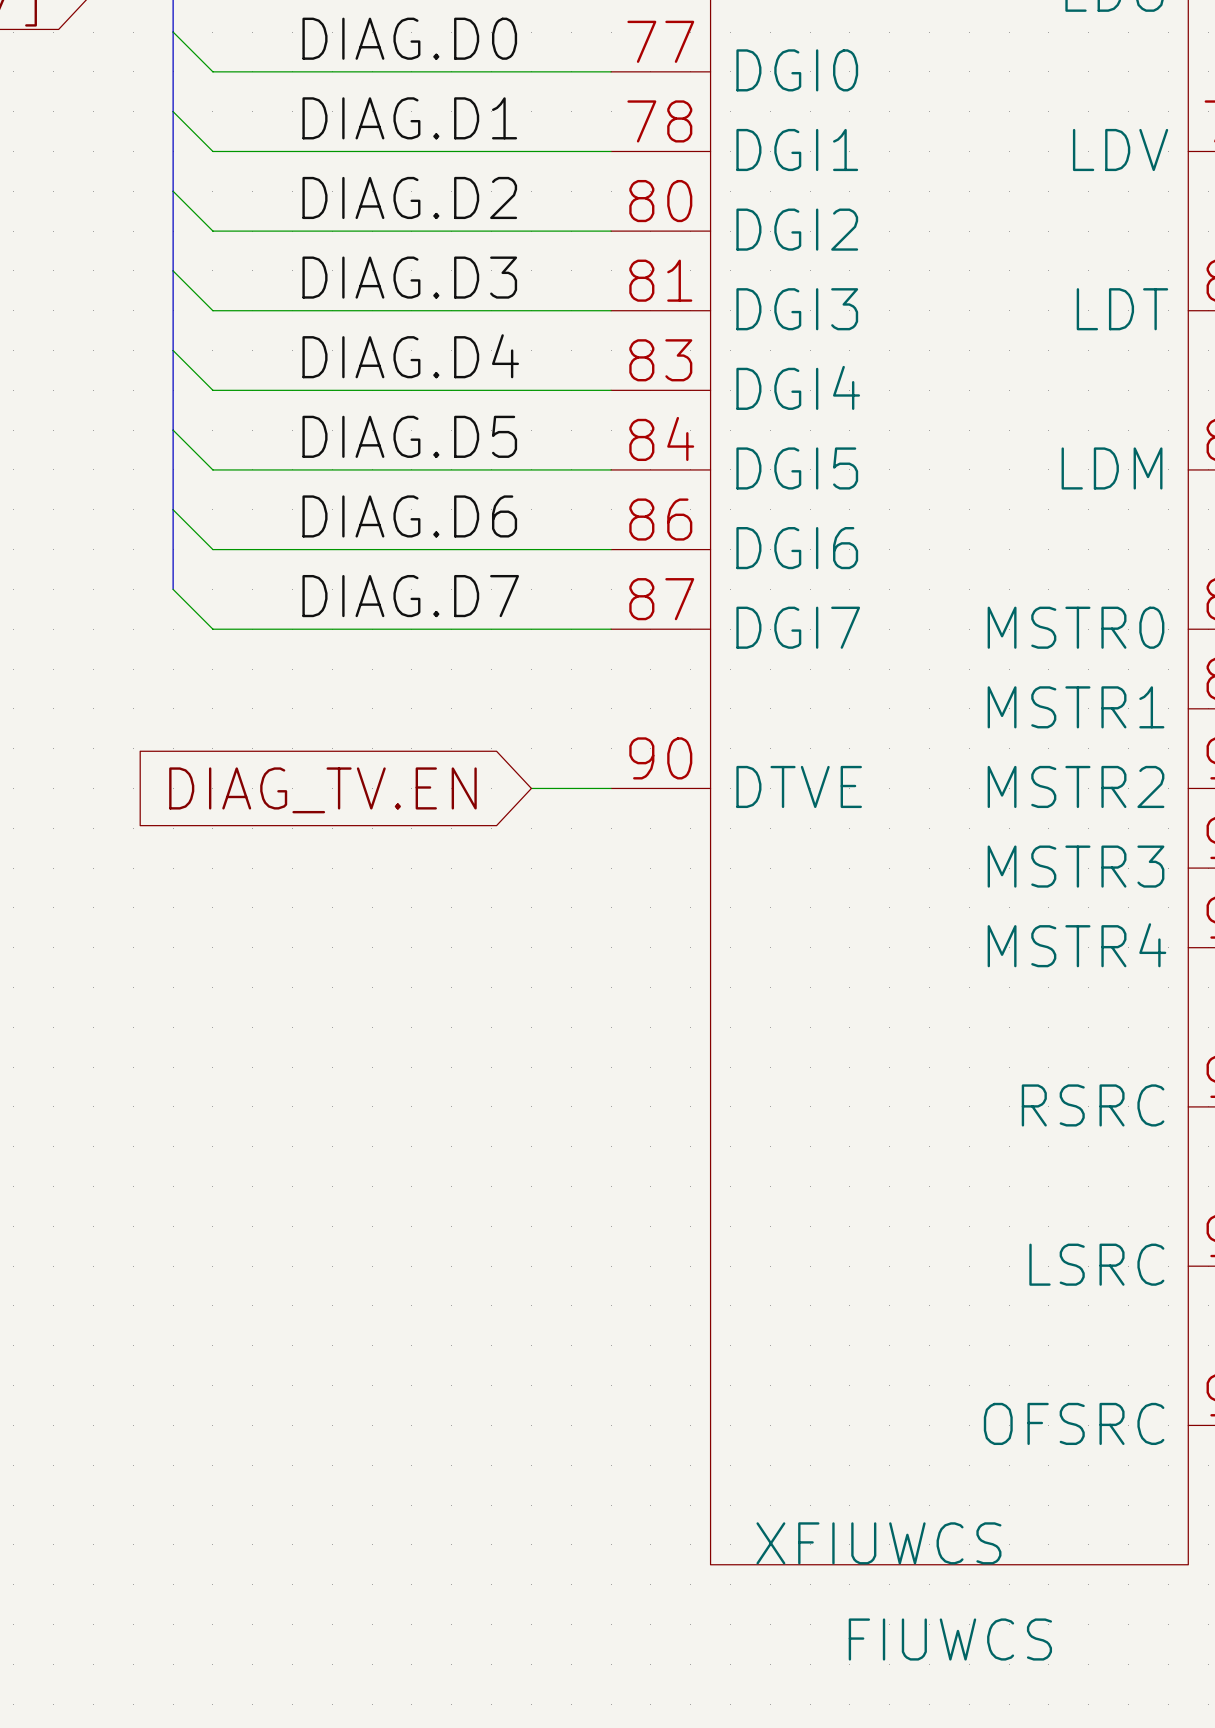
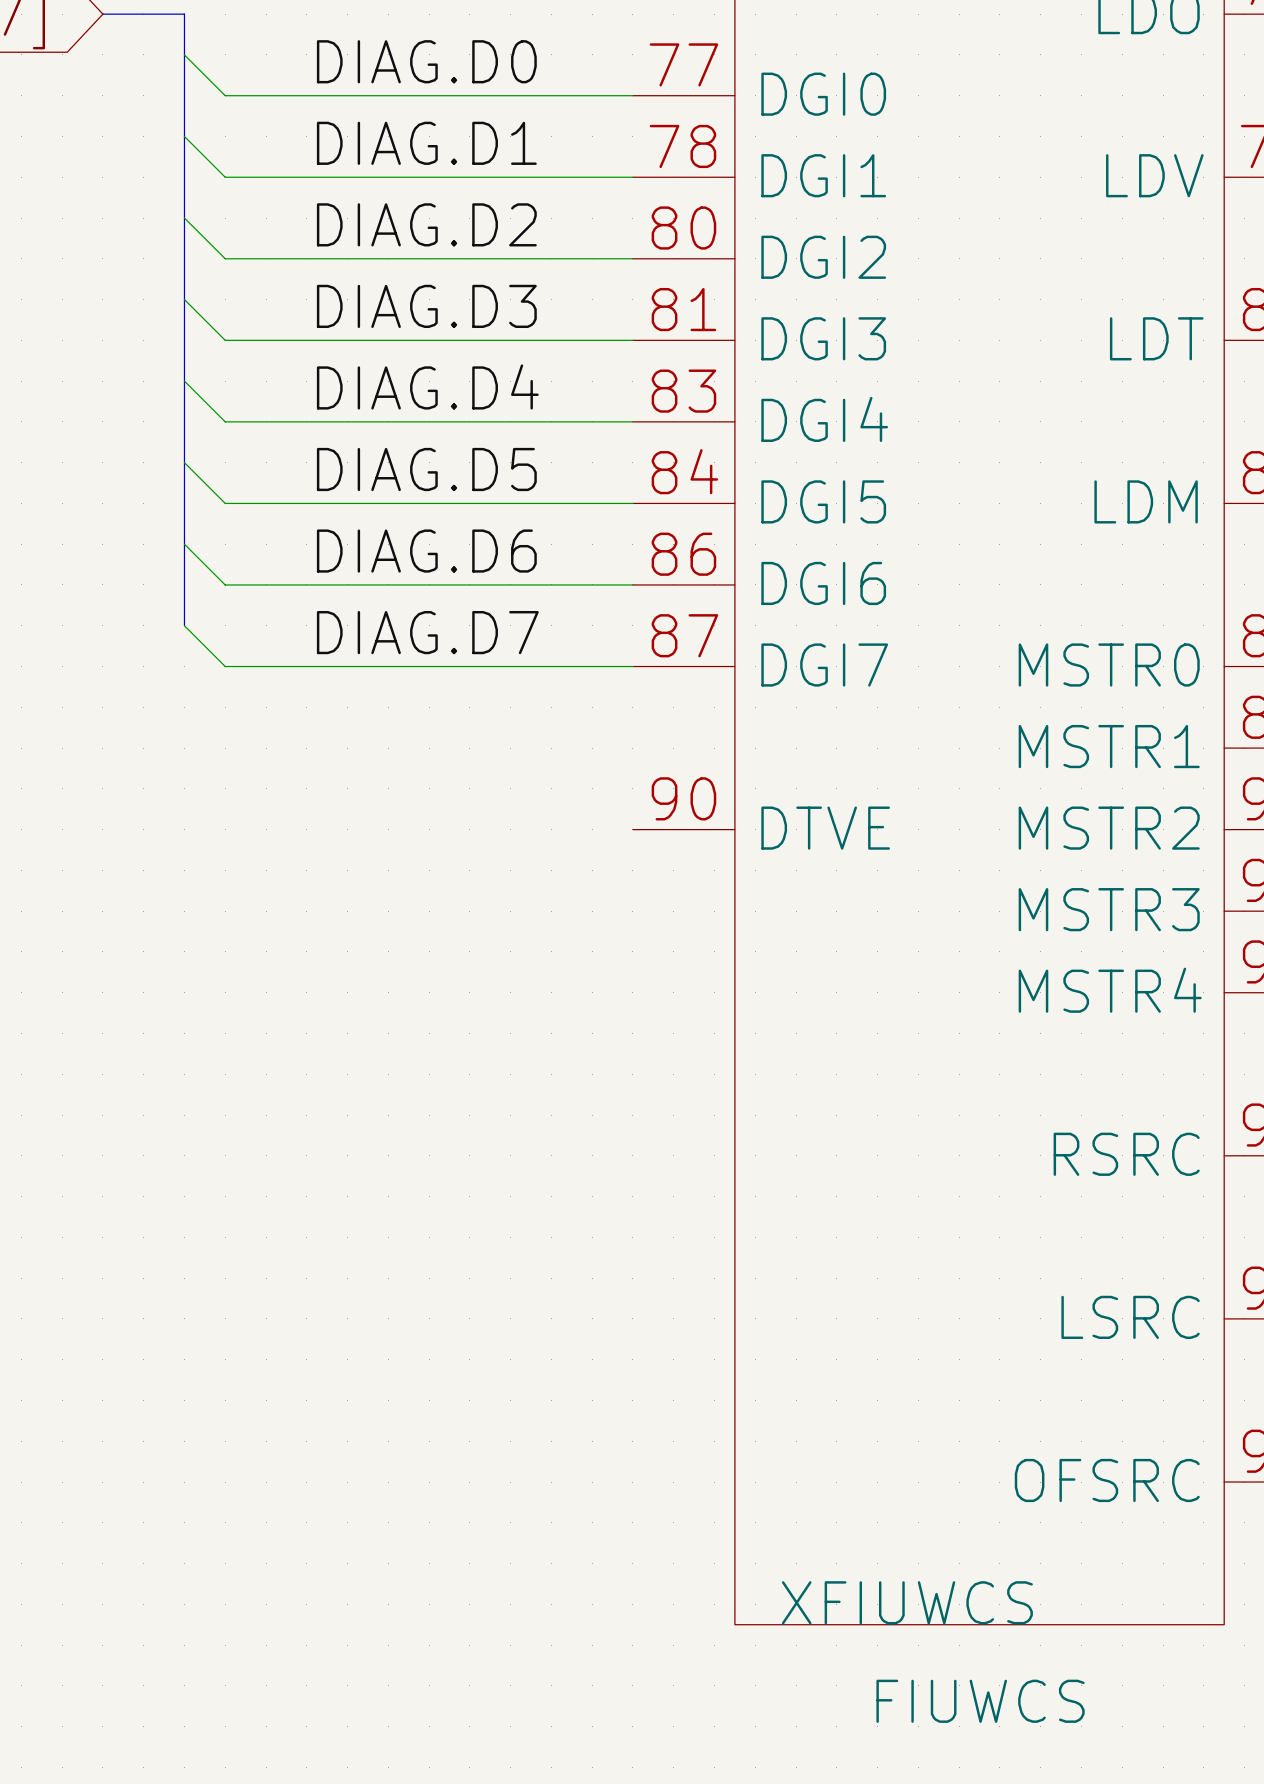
wire: (531, 788) (611, 788) -> none
global label: DIAG_TV.EN (322, 790) -> none

